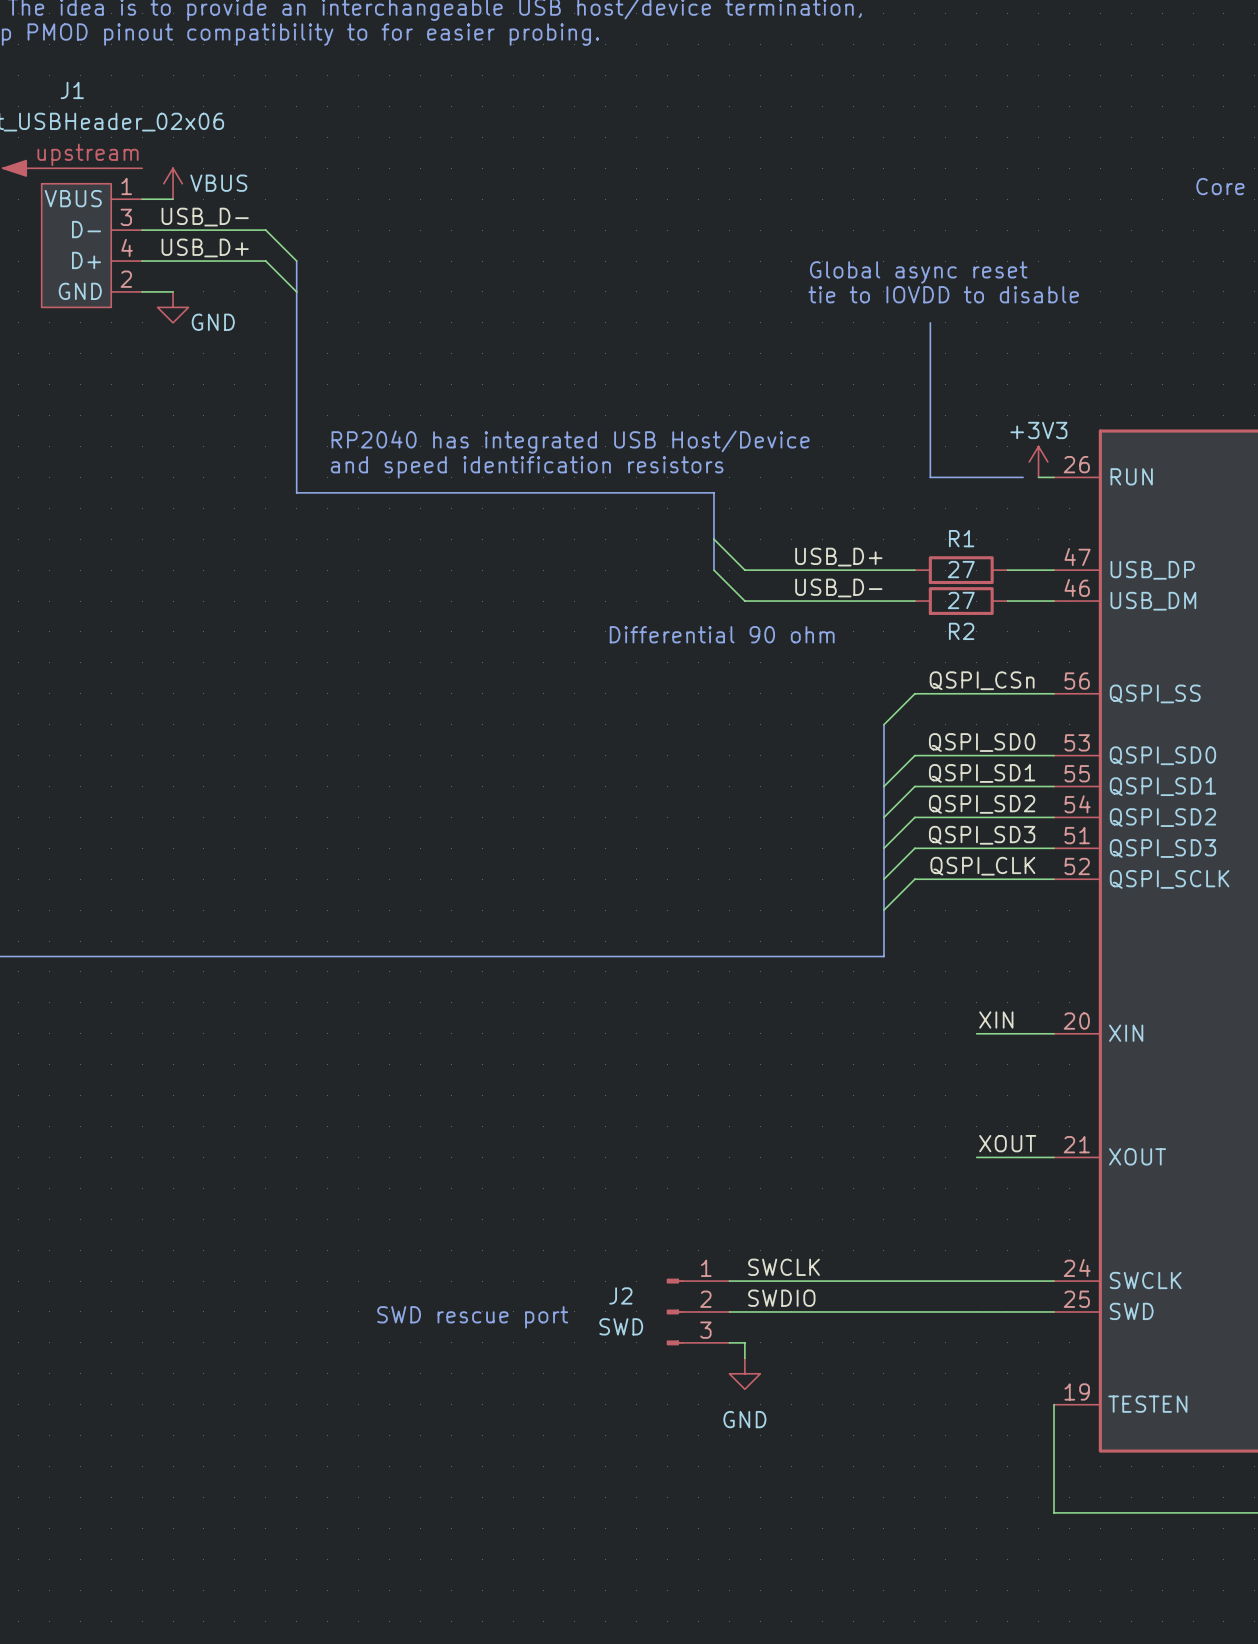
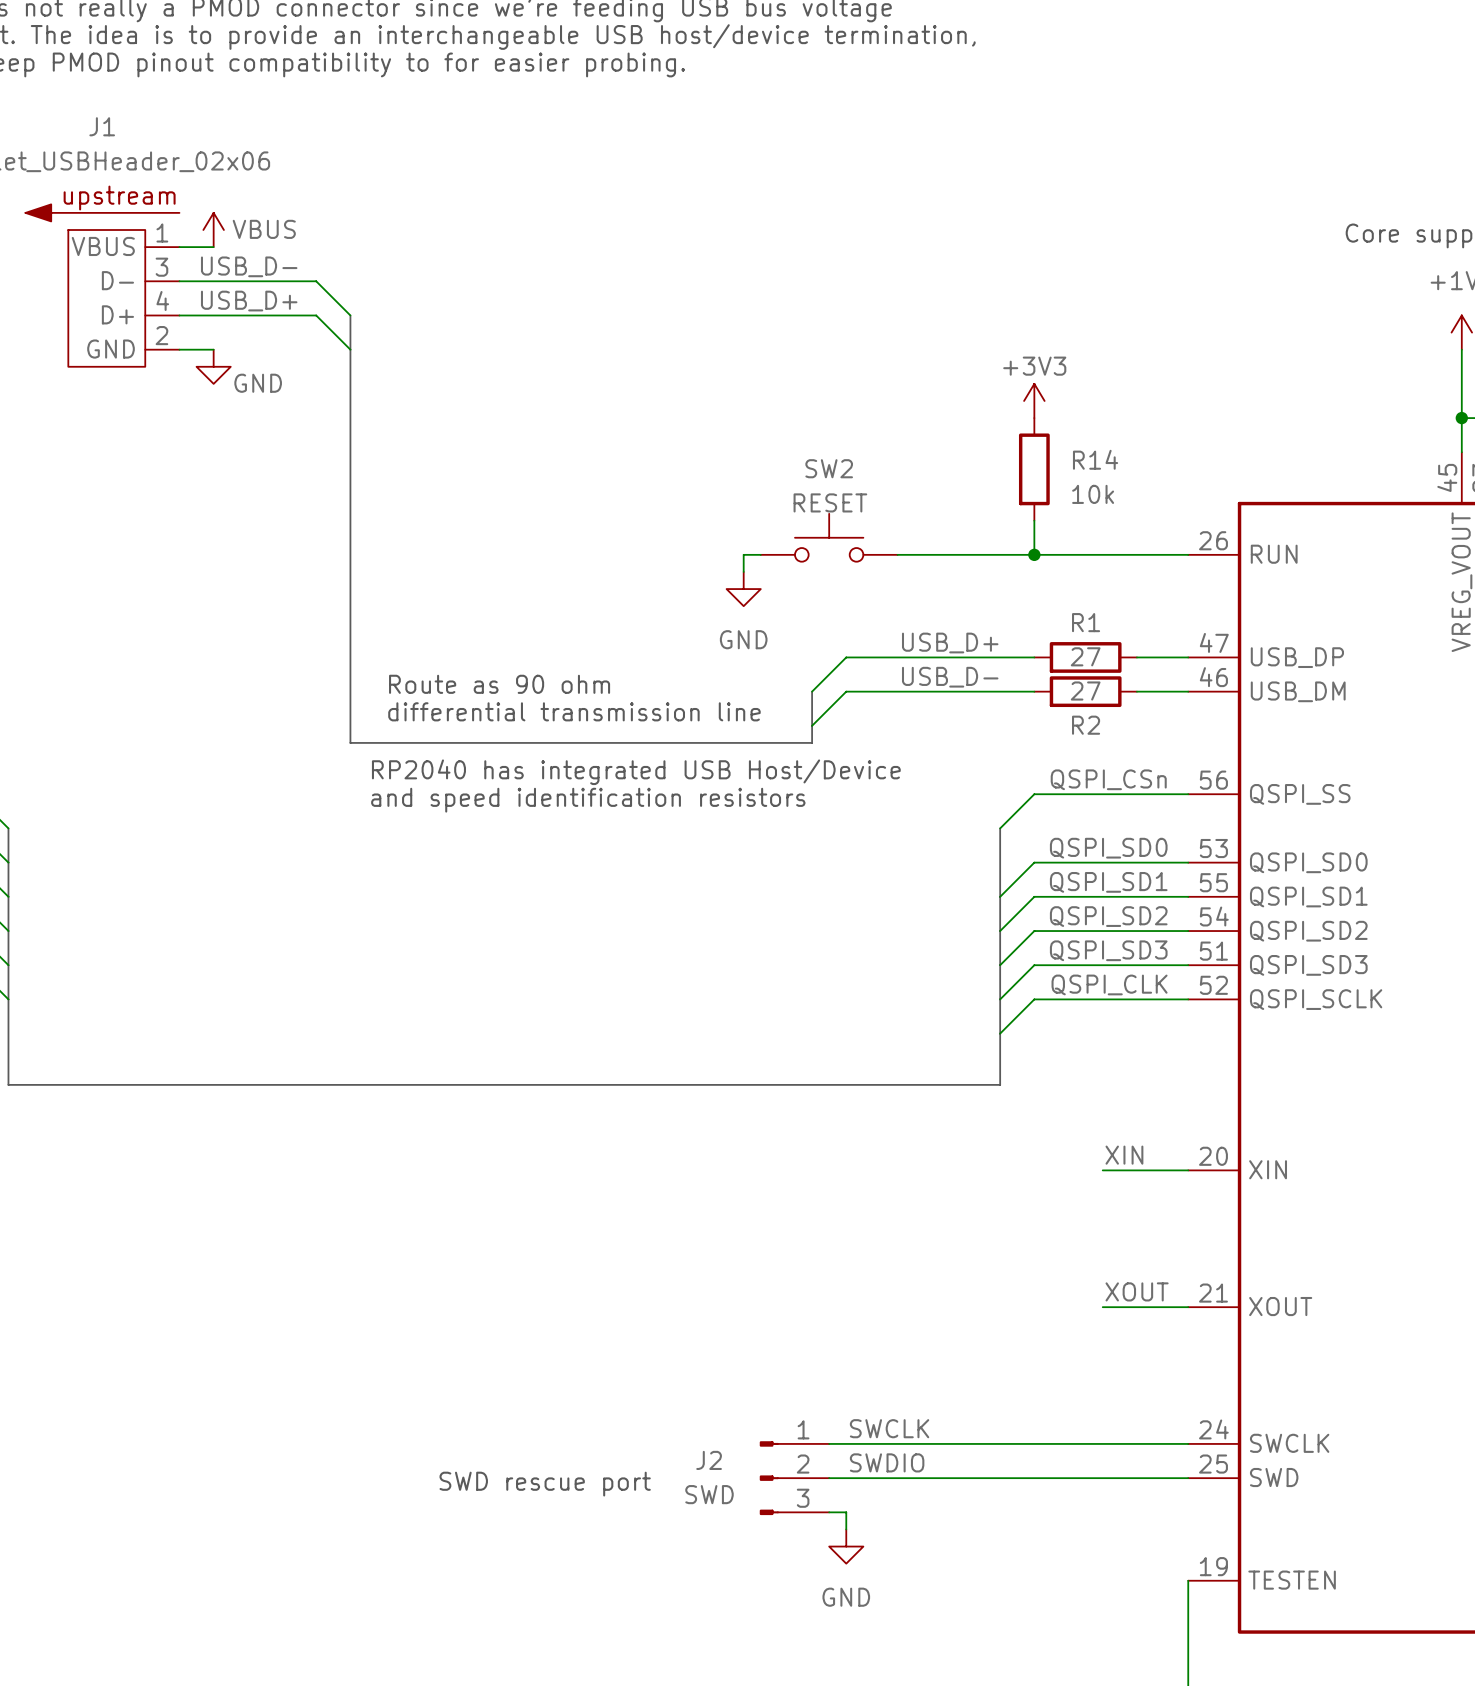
text: Global async reset (918, 272) -> none
text: tie to IOVDD to disable (943, 294) -> none
line: (930, 322) (930, 477) (1023, 477) -> none
R14: none -> 10k (1034, 469)
text position: RP2040 has integrated USB Host/Device (570, 442) -> RP2040 has integrated USB Host/Device (636, 772)
wire: none -> (1034, 520) (1034, 554)
SW2: none -> RESET (829, 537)
power symbol position: +3V3 (1038, 461) -> +3V3 (1034, 400)
text position: and speed identification resistors (527, 467) -> and speed identification resistors (588, 800)
wire: none -> (760, 554) (743, 554) (743, 571)
wire: none -> (897, 554) (1171, 554)
junction: none -> (1034, 554)
bus: (296, 492) (713, 492) (713, 570) -> (350, 571) (350, 742) (812, 742) (812, 691)
power symbol: none -> GND (743, 589)
wire: (713, 539) (744, 570) -> (812, 691) (846, 657)
wire: (713, 570) (744, 601) -> (812, 725) (846, 691)
text: none -> Route as 90 ohm (499, 684)
text: none -> differential transmission line (574, 711)
text: Differential 90 ohm (722, 634) -> none

